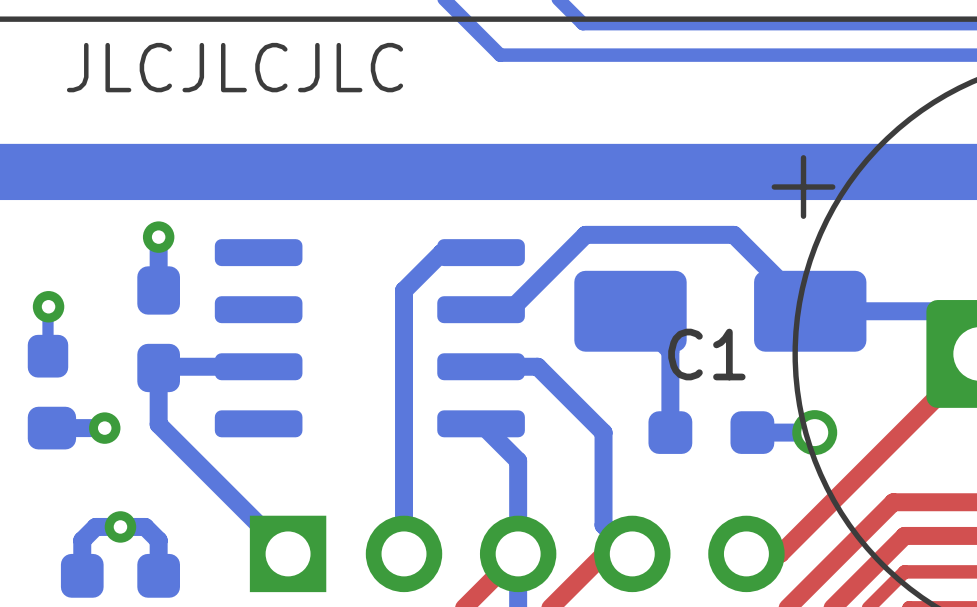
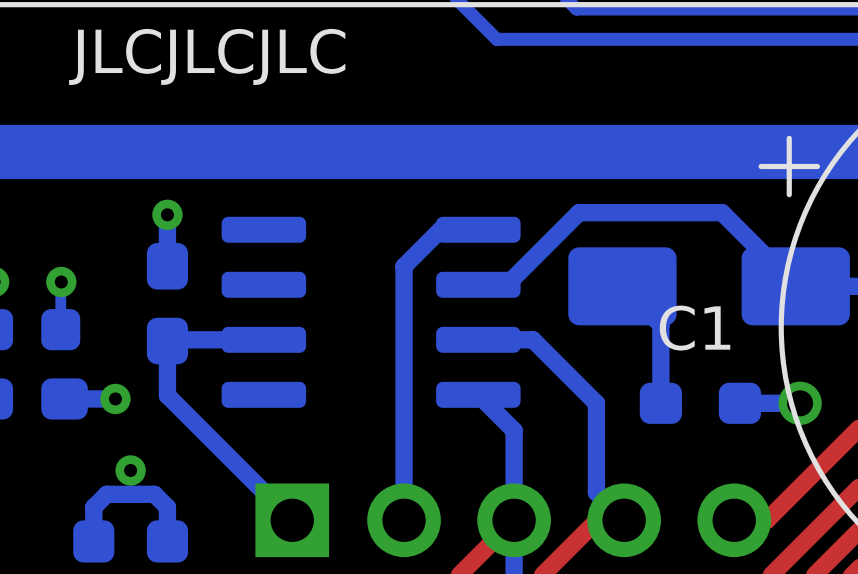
via position: (120, 526) -> (130, 470)

